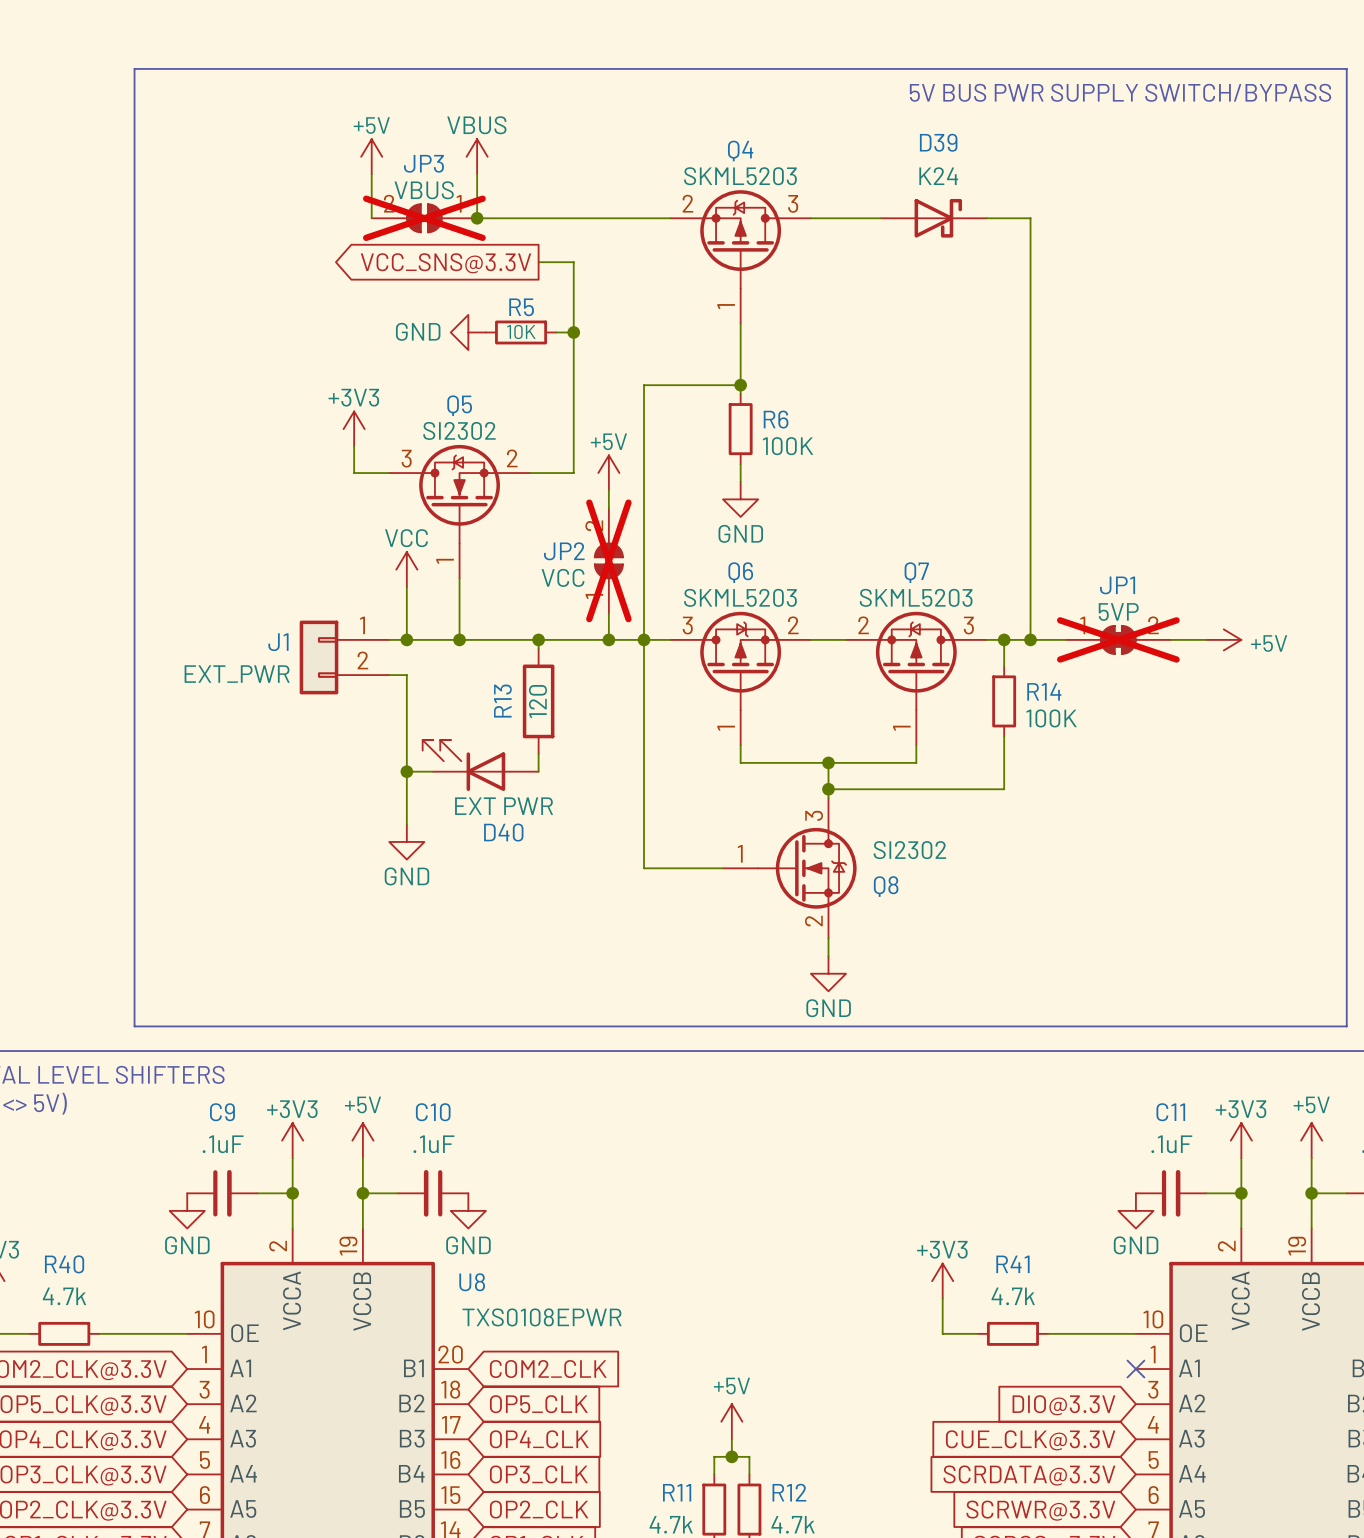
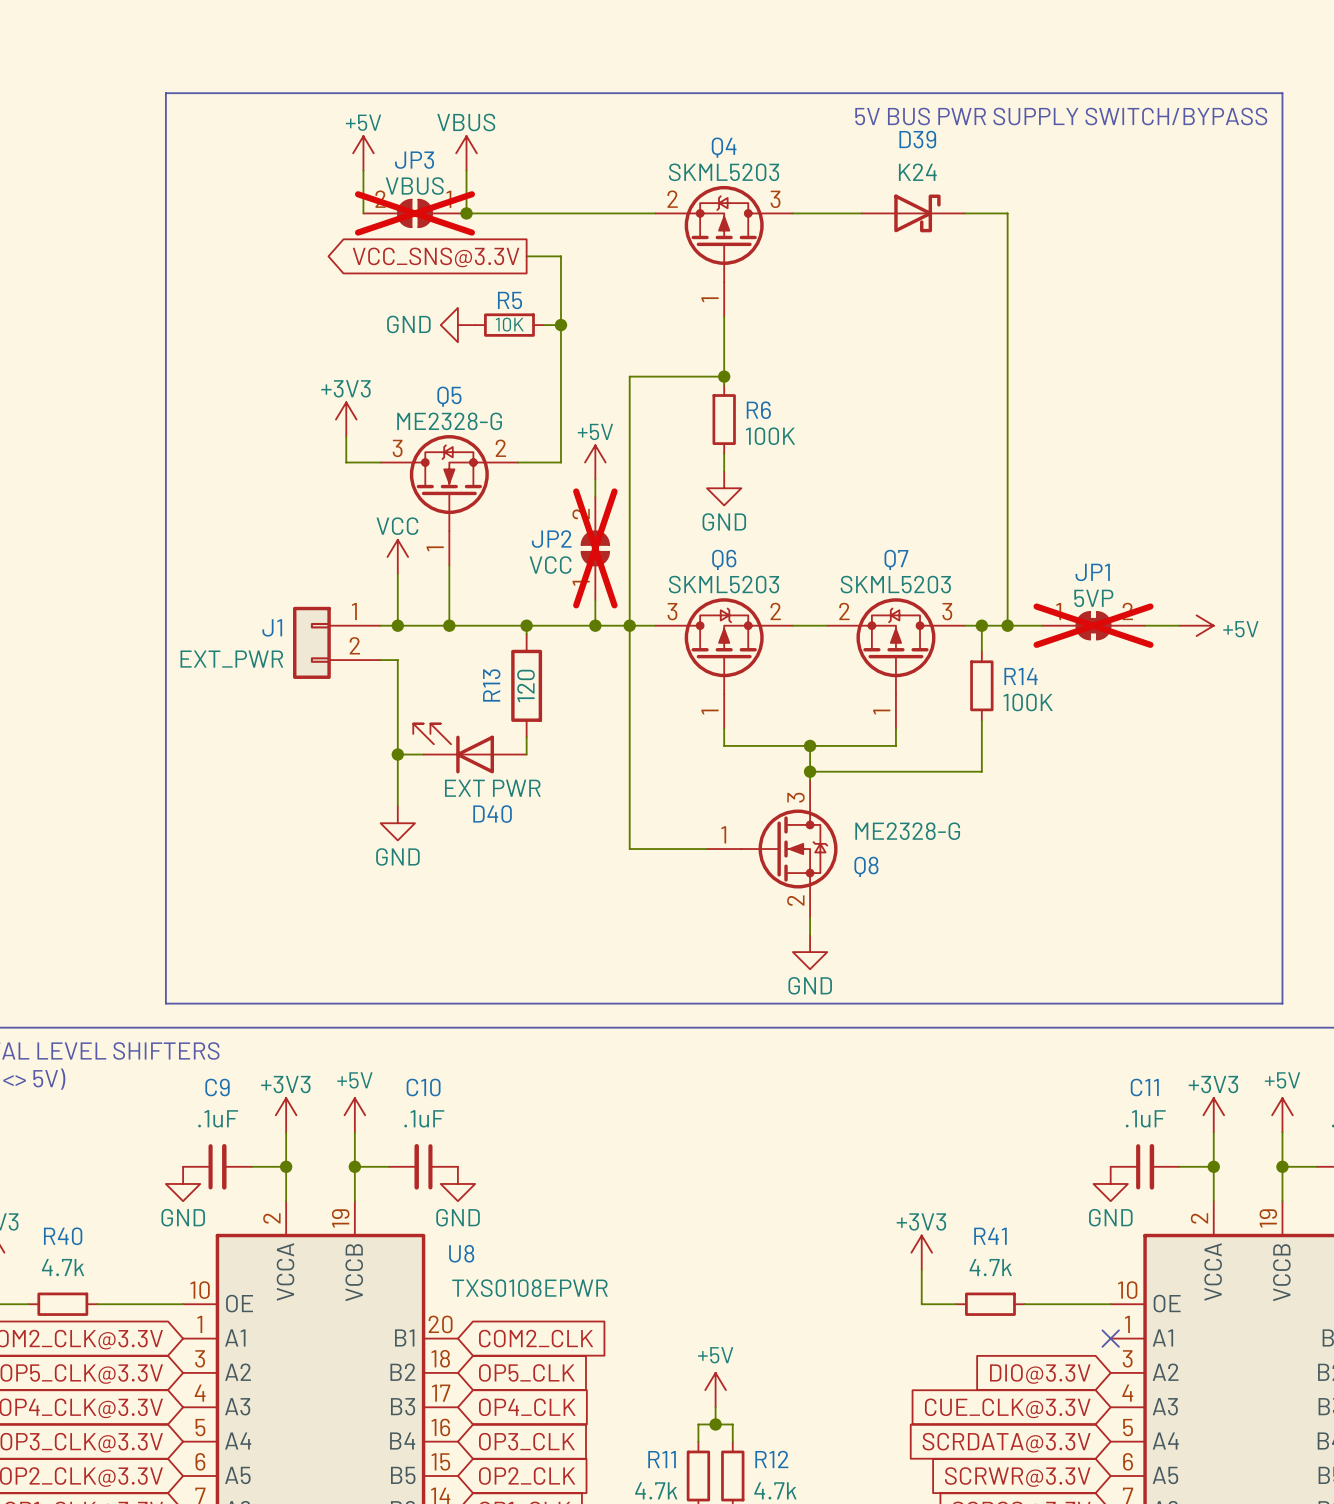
text position: 5V BUS PWR SUPPLY SWITCH/BYPASS (1120, 92) -> 5V BUS PWR SUPPLY SWITCH/BYPASS (1061, 116)
Q5 value: SI2302 (459, 430) -> ME2328-G (449, 421)
Q8 value: SI2302 (909, 850) -> ME2328-G (907, 831)
line: (169, 1026) (134, 1026) (134, 68) (1346, 68) (1346, 1026) (1311, 1026) -> (165, 1003) (165, 93) (1282, 93) (1282, 1003)

